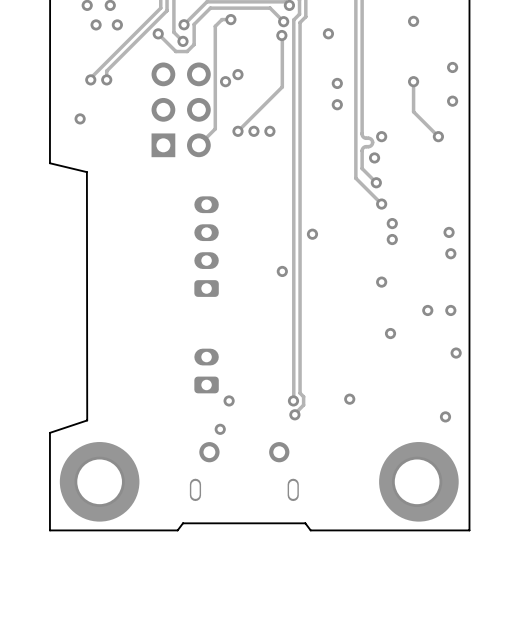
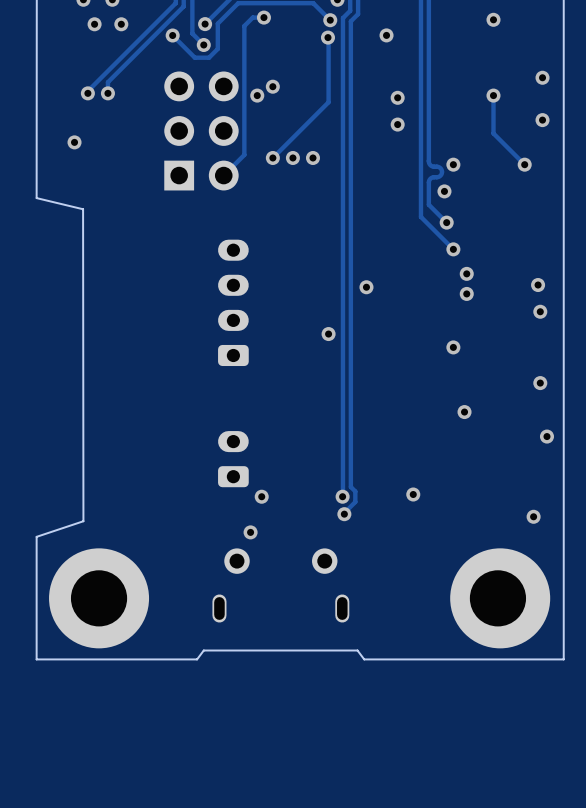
via: (427, 310) -> none

